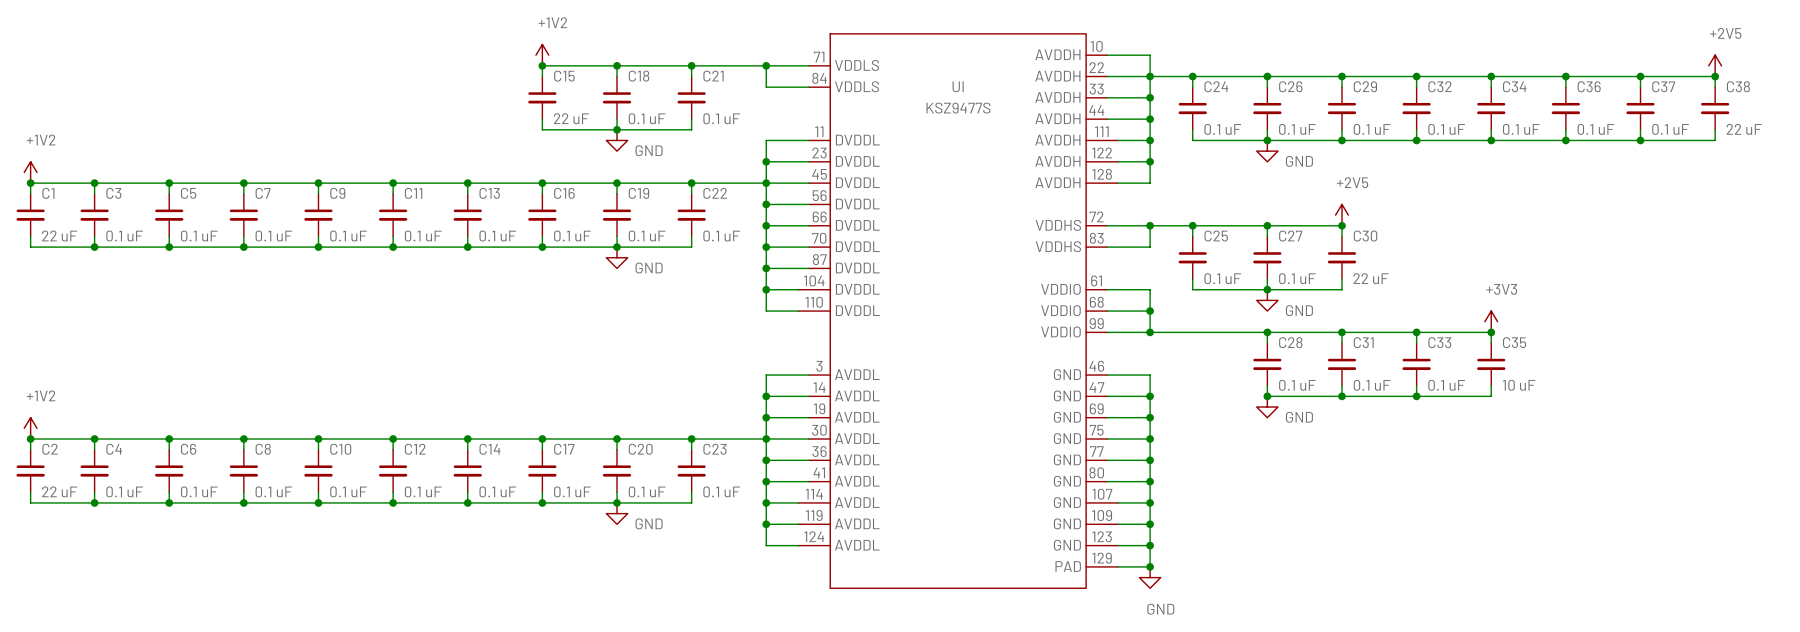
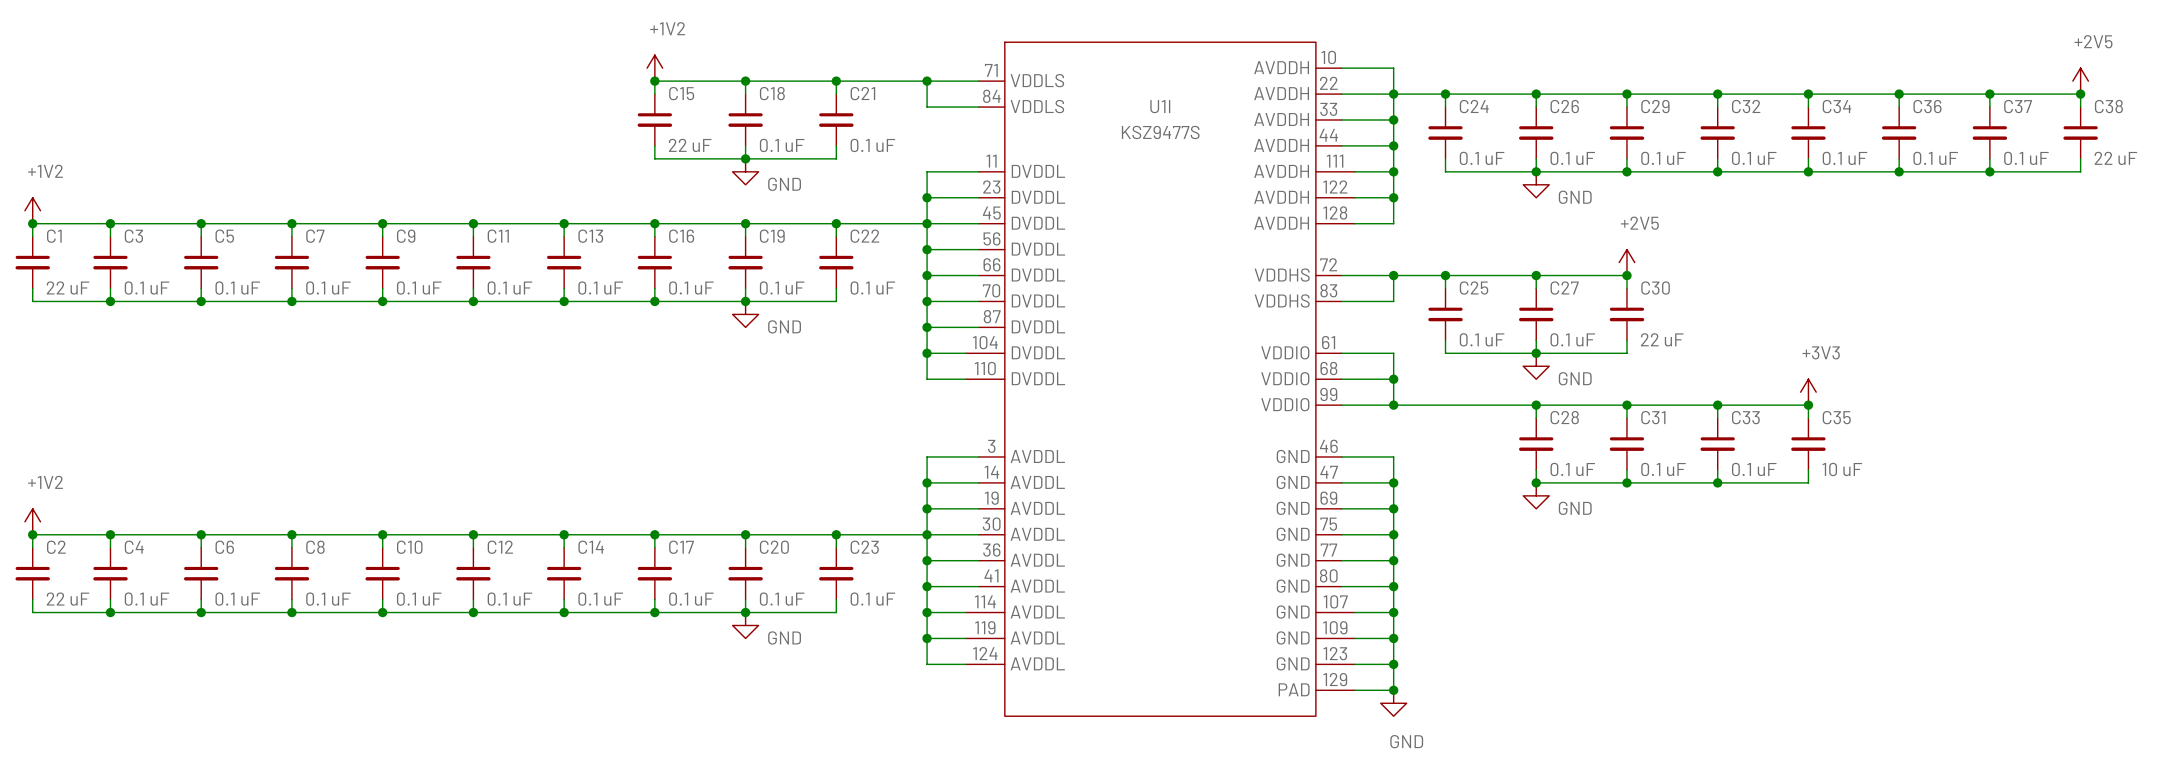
UI name: UI (958, 86) -> U1I (1160, 106)

